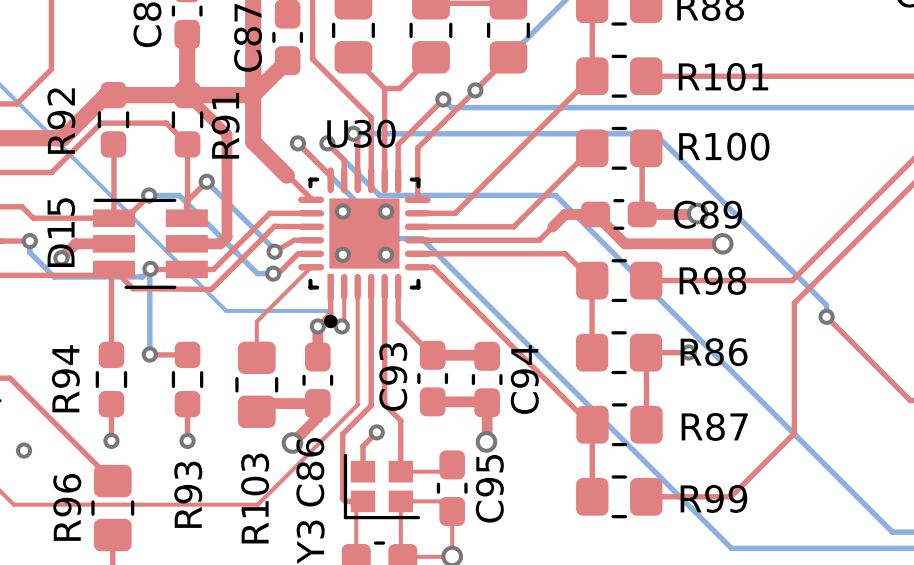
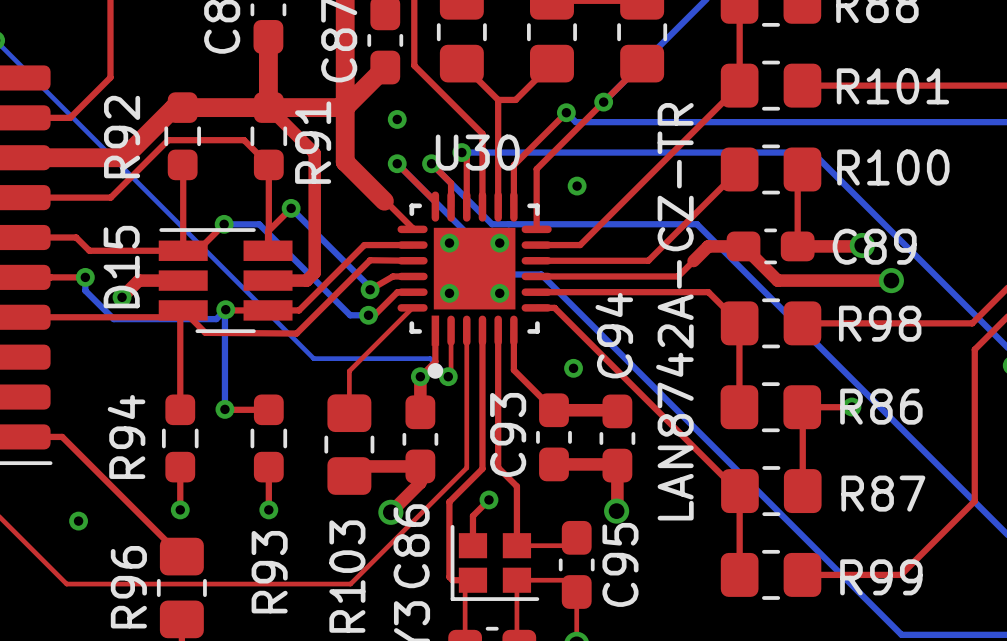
via: none -> (397, 119)
via: none -> (577, 186)
U30 value: none -> LAN8742A-CZ-TR (674, 311)
via: none -> (573, 368)
C94 name position: C94 (524, 379) -> C94 (614, 335)

